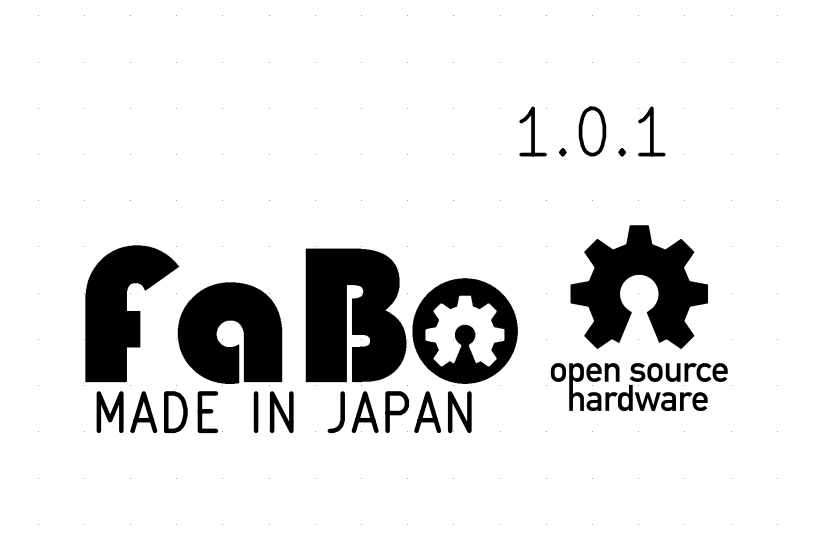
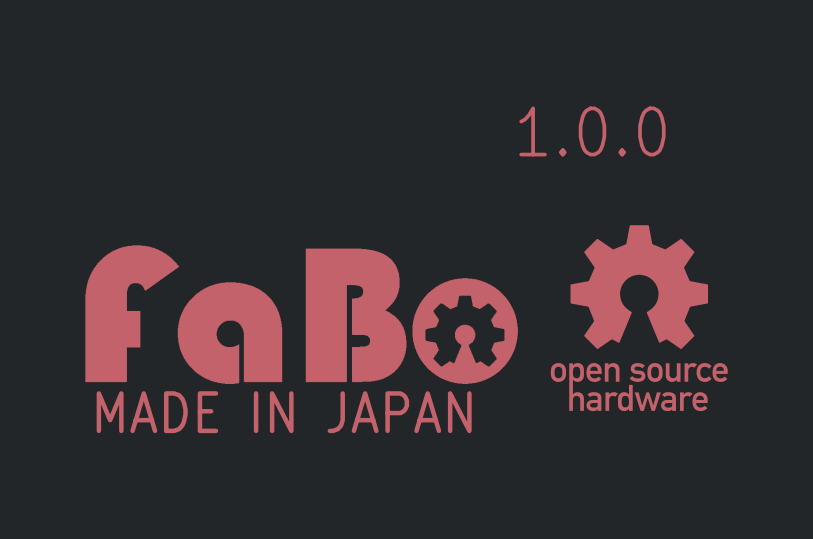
text: 1.0.1 (592, 131) -> 1.0.0 (592, 131)

